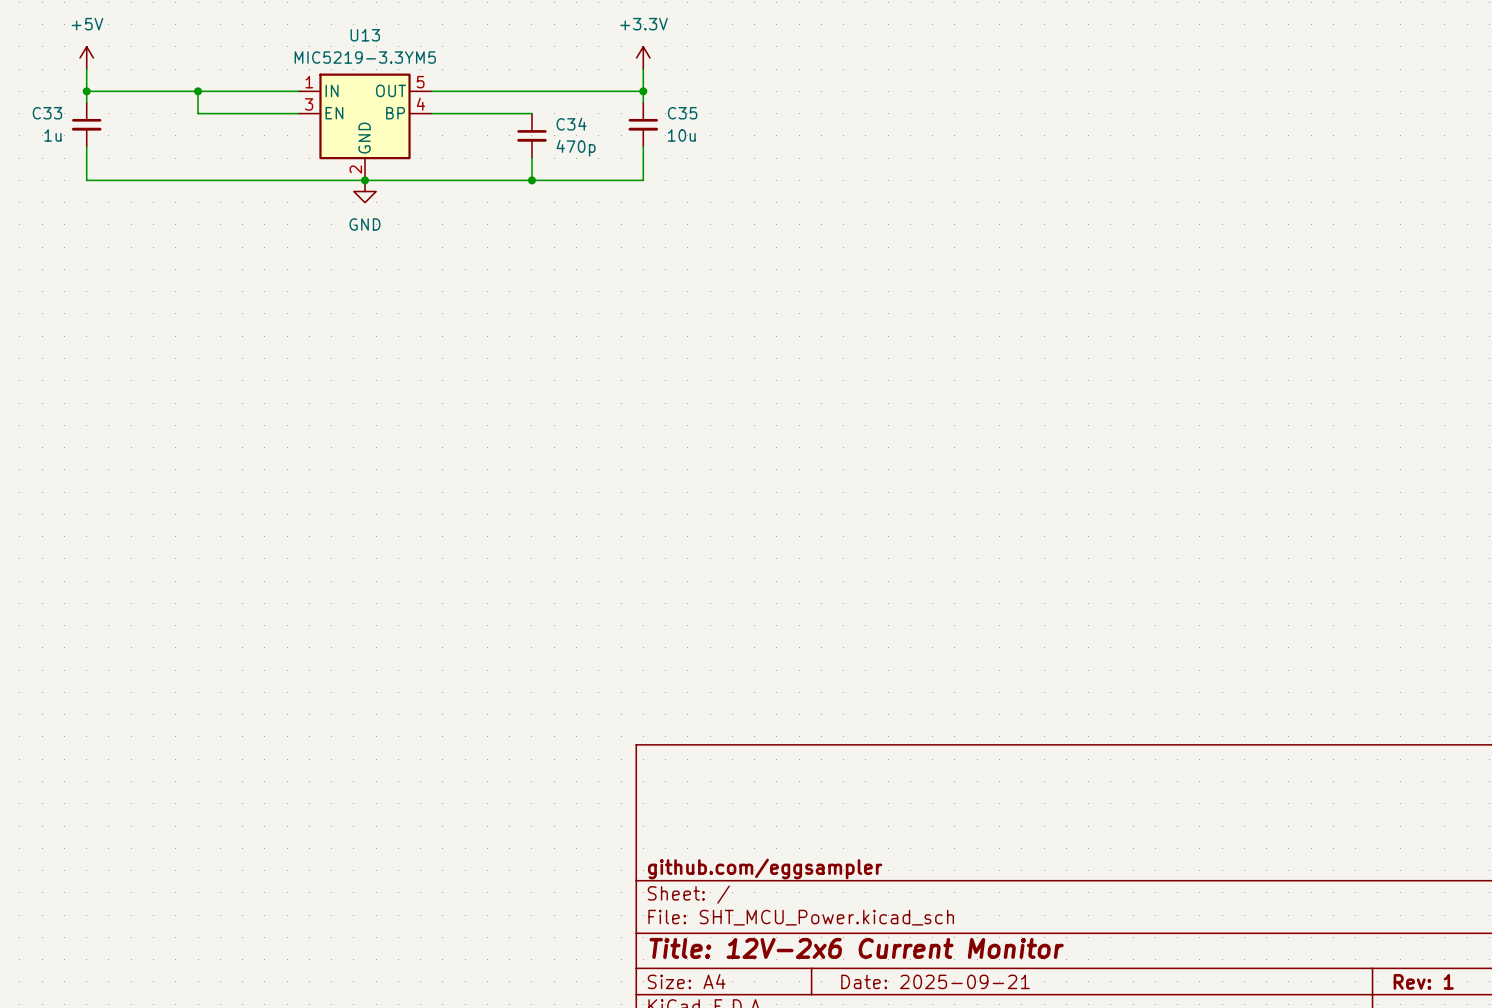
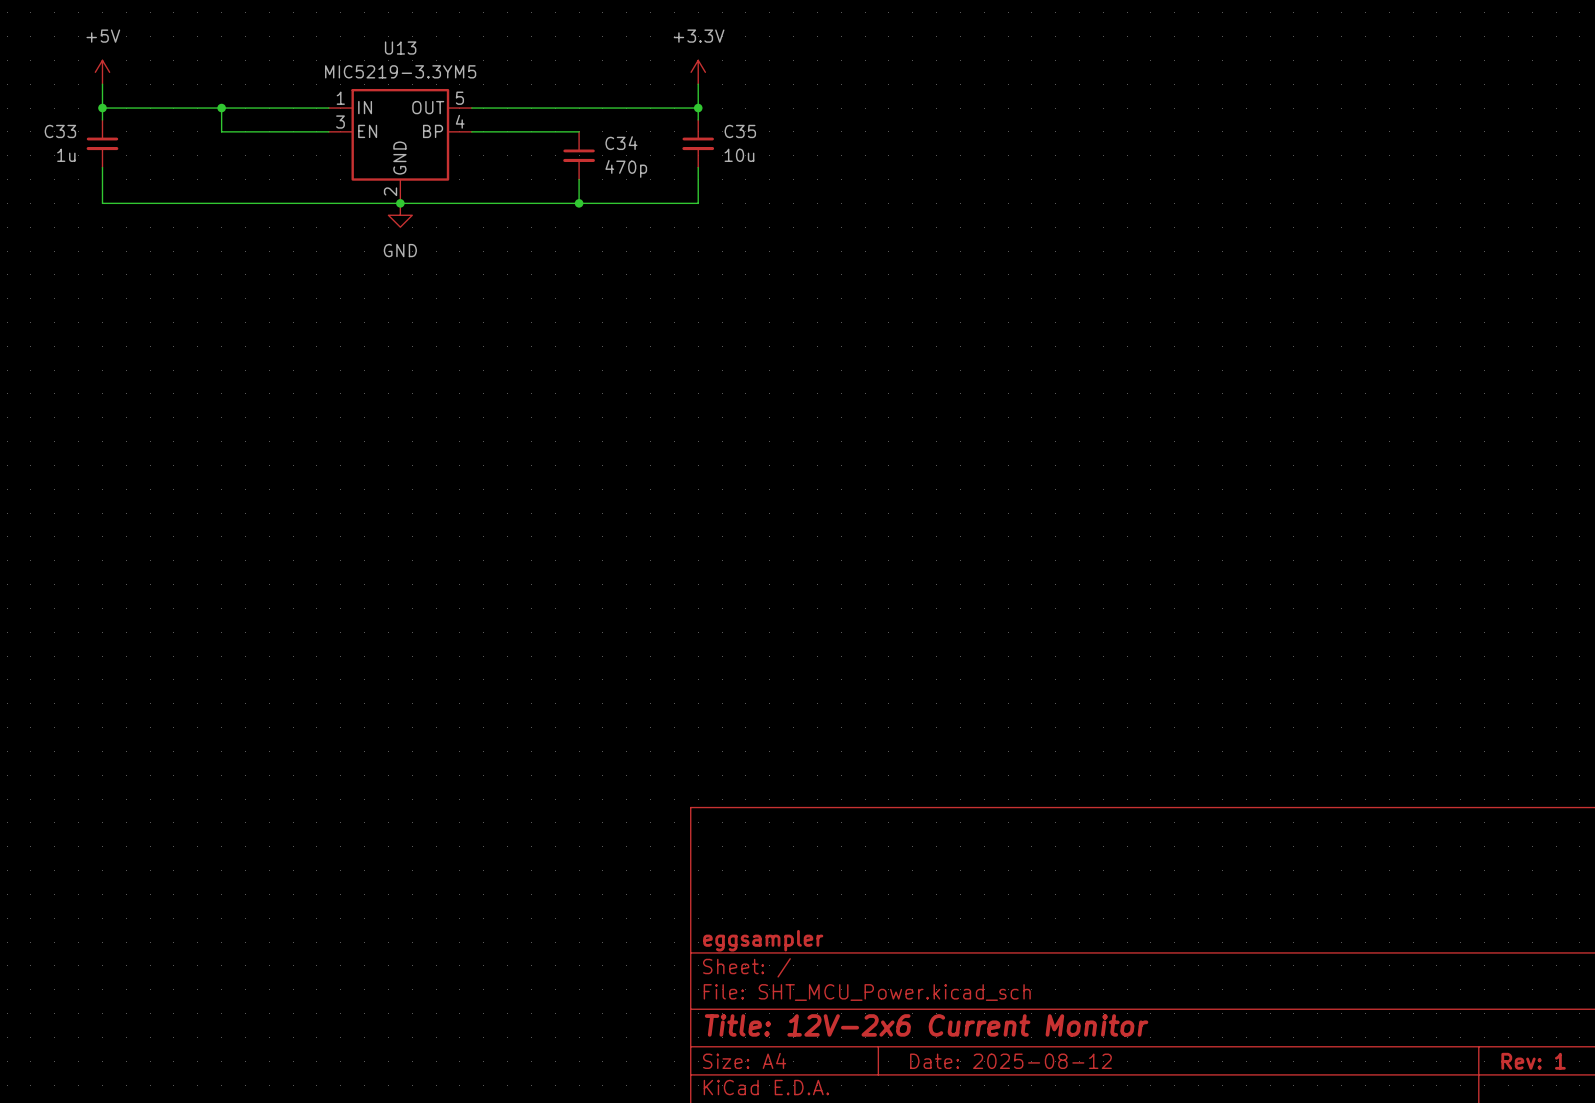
title block: github.com/eggsampler (765, 868) -> eggsampler (763, 940)
title block: Date: 2025-09-21 (935, 981) -> Date: 2025-08-12 (1010, 1061)

